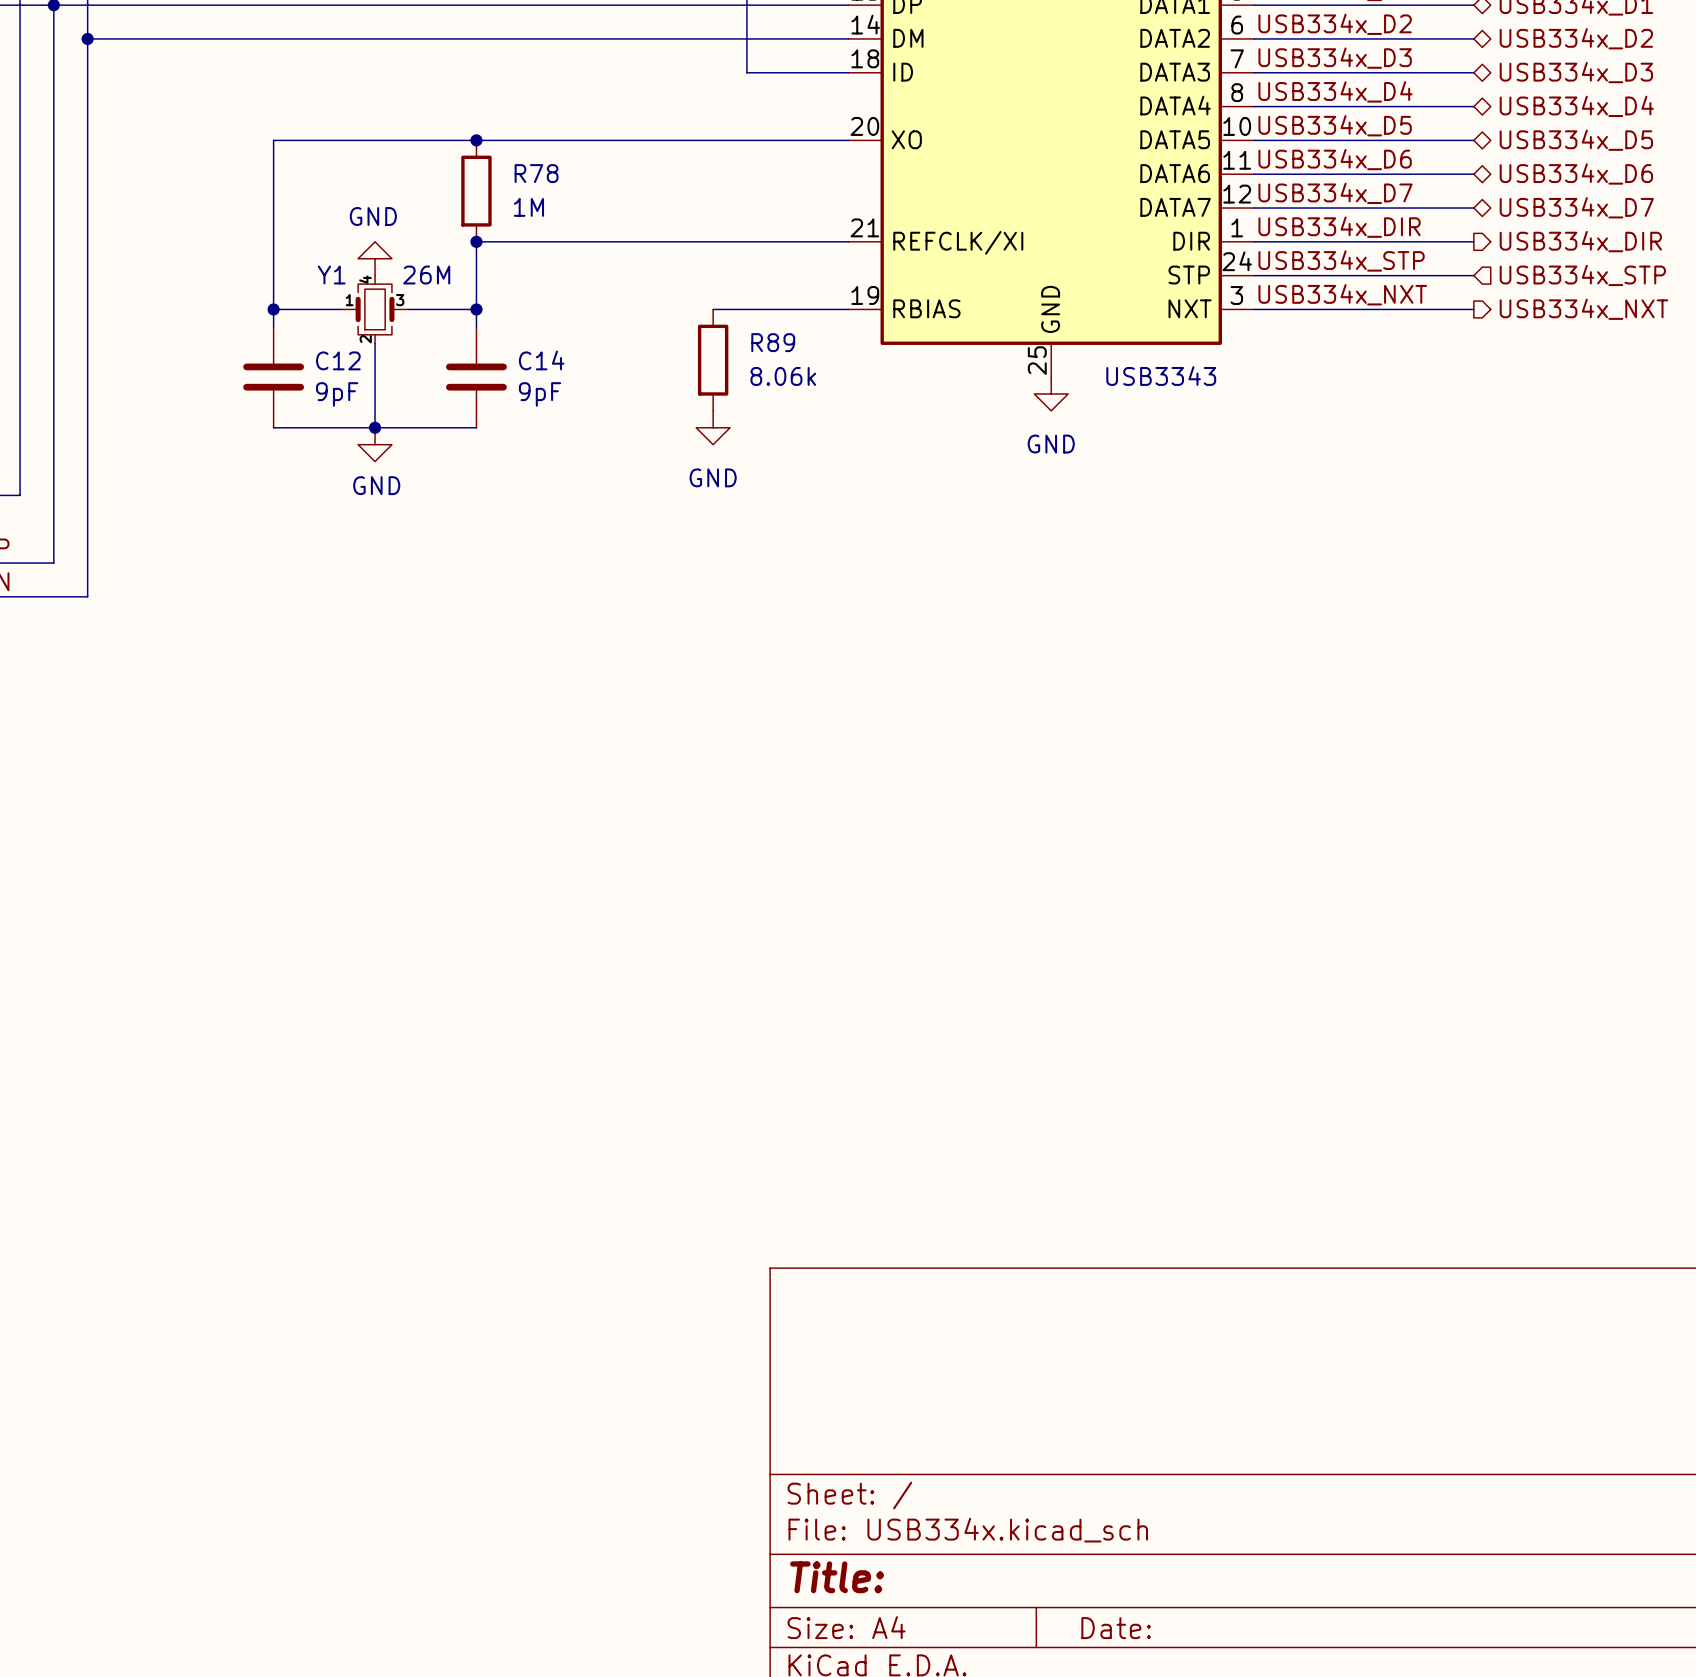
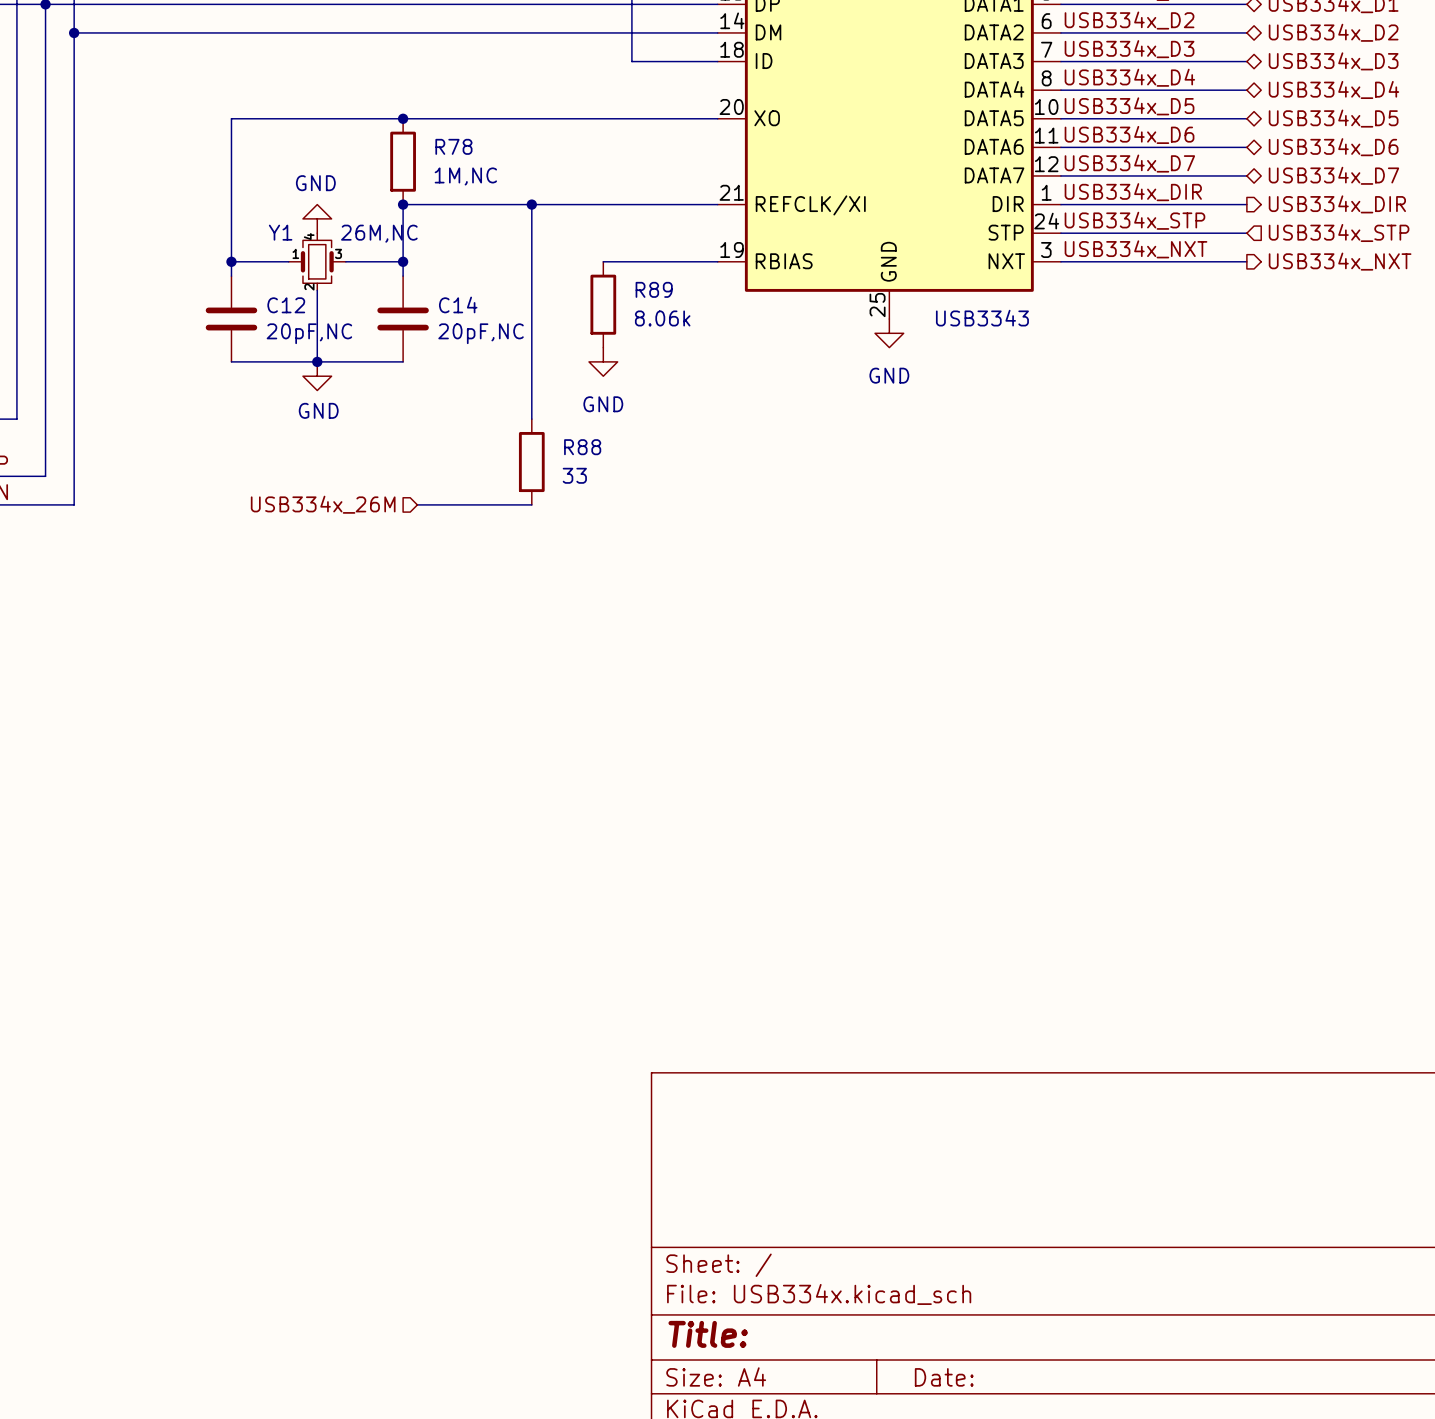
R78 value: 1M (528, 207) -> 1M,NC (465, 176)
wire: none -> (531, 204) (531, 419)
junction: none -> (531, 204)
Y1 value: 26M (426, 275) -> 26M,NC (379, 233)
C12 value: 9pF (337, 394) -> 20pF,NC (309, 333)
C14 value: 9pF (540, 394) -> 20pF,NC (481, 333)
R88: none -> 33 (531, 462)
hierarchical label: none -> USB334x_26M (323, 504)
wire: none -> (417, 504) (531, 504)

